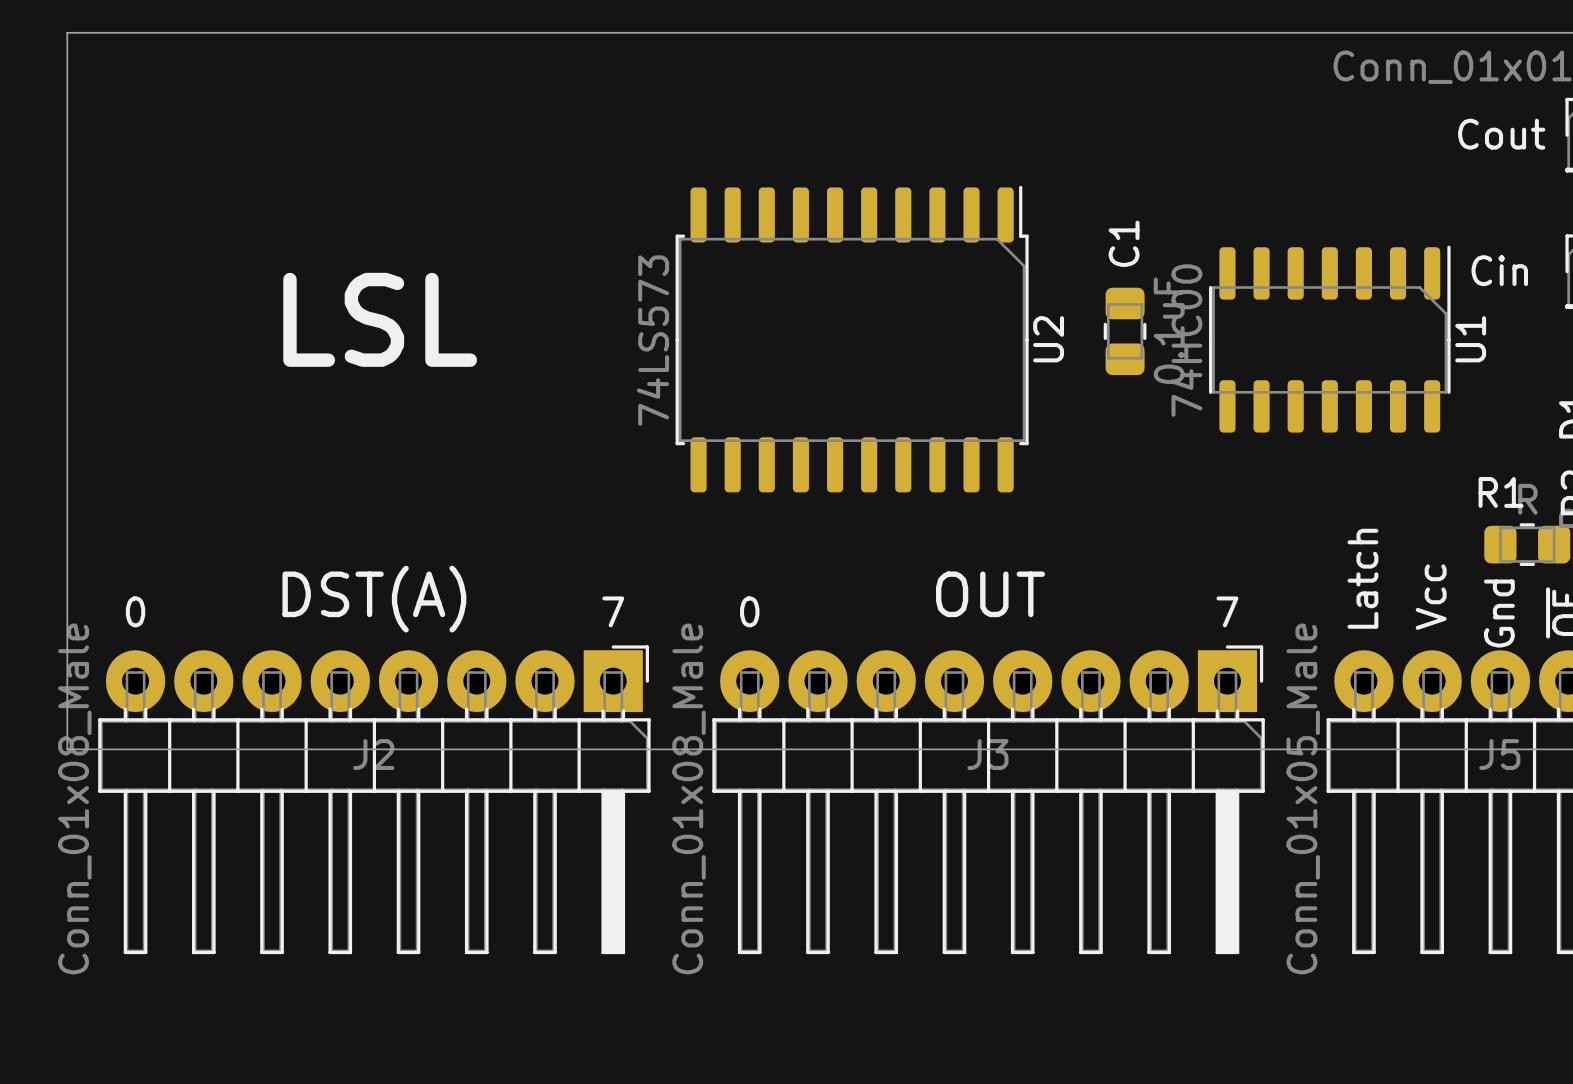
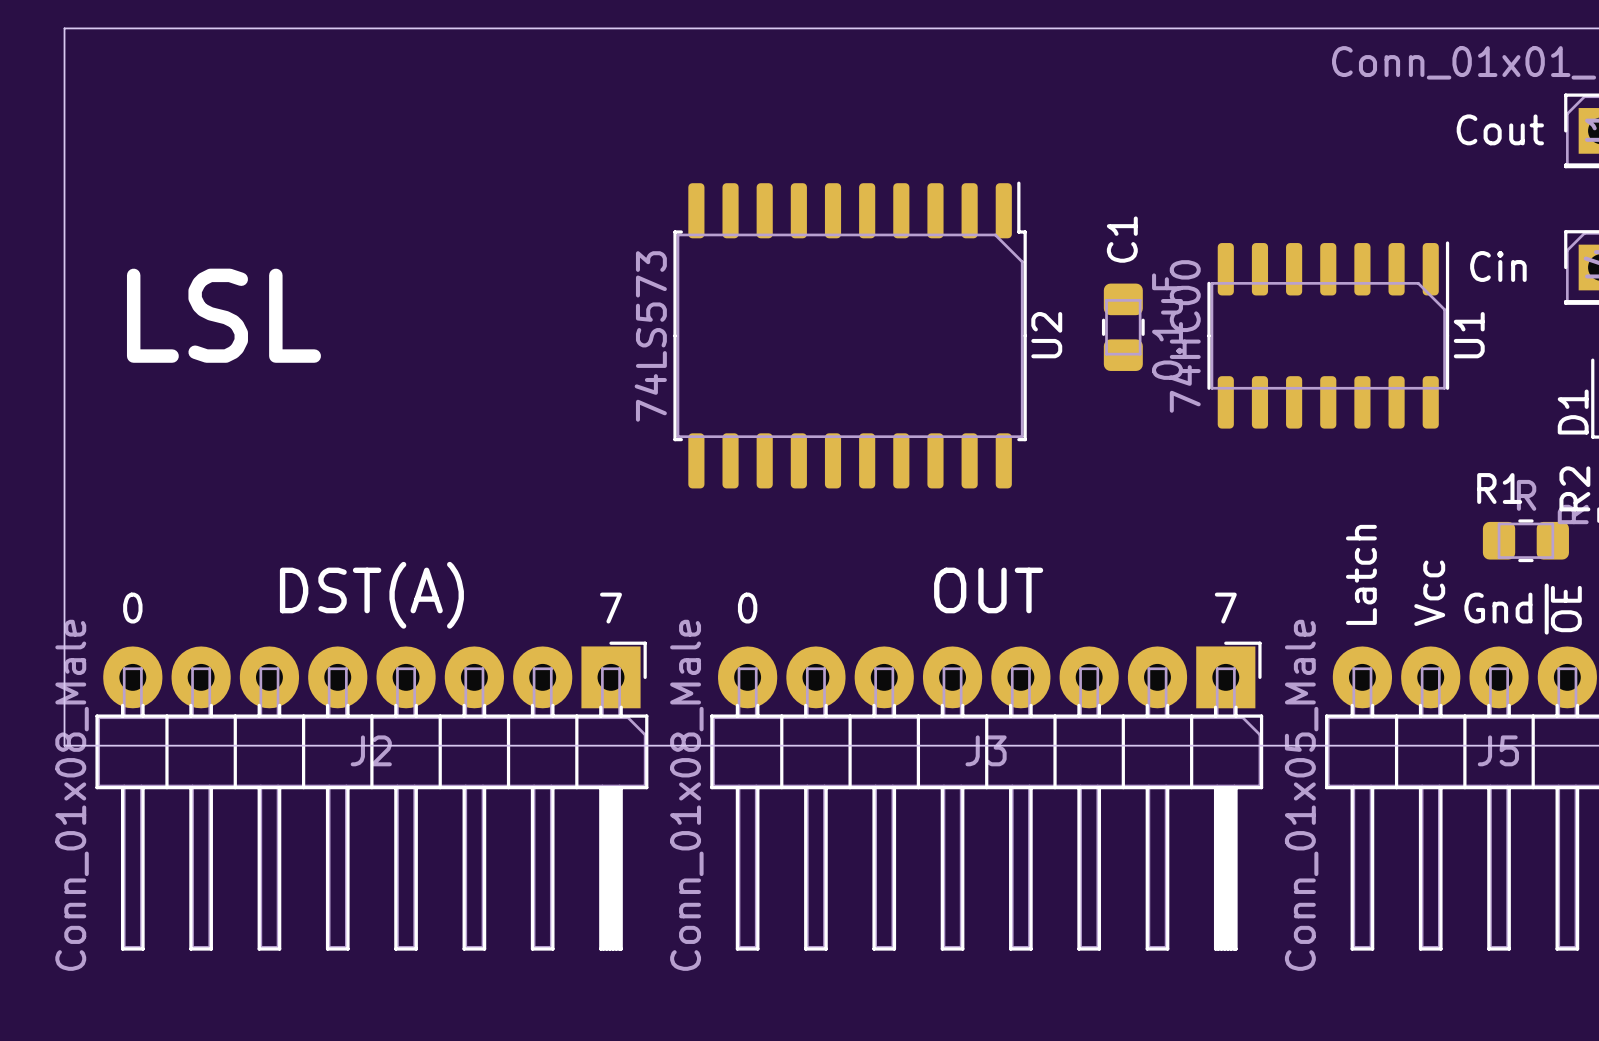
text position: LSL (380, 319) -> LSL (223, 315)
text rotation: 0° (1499, 613) -> 90° clockwise (1498, 608)

